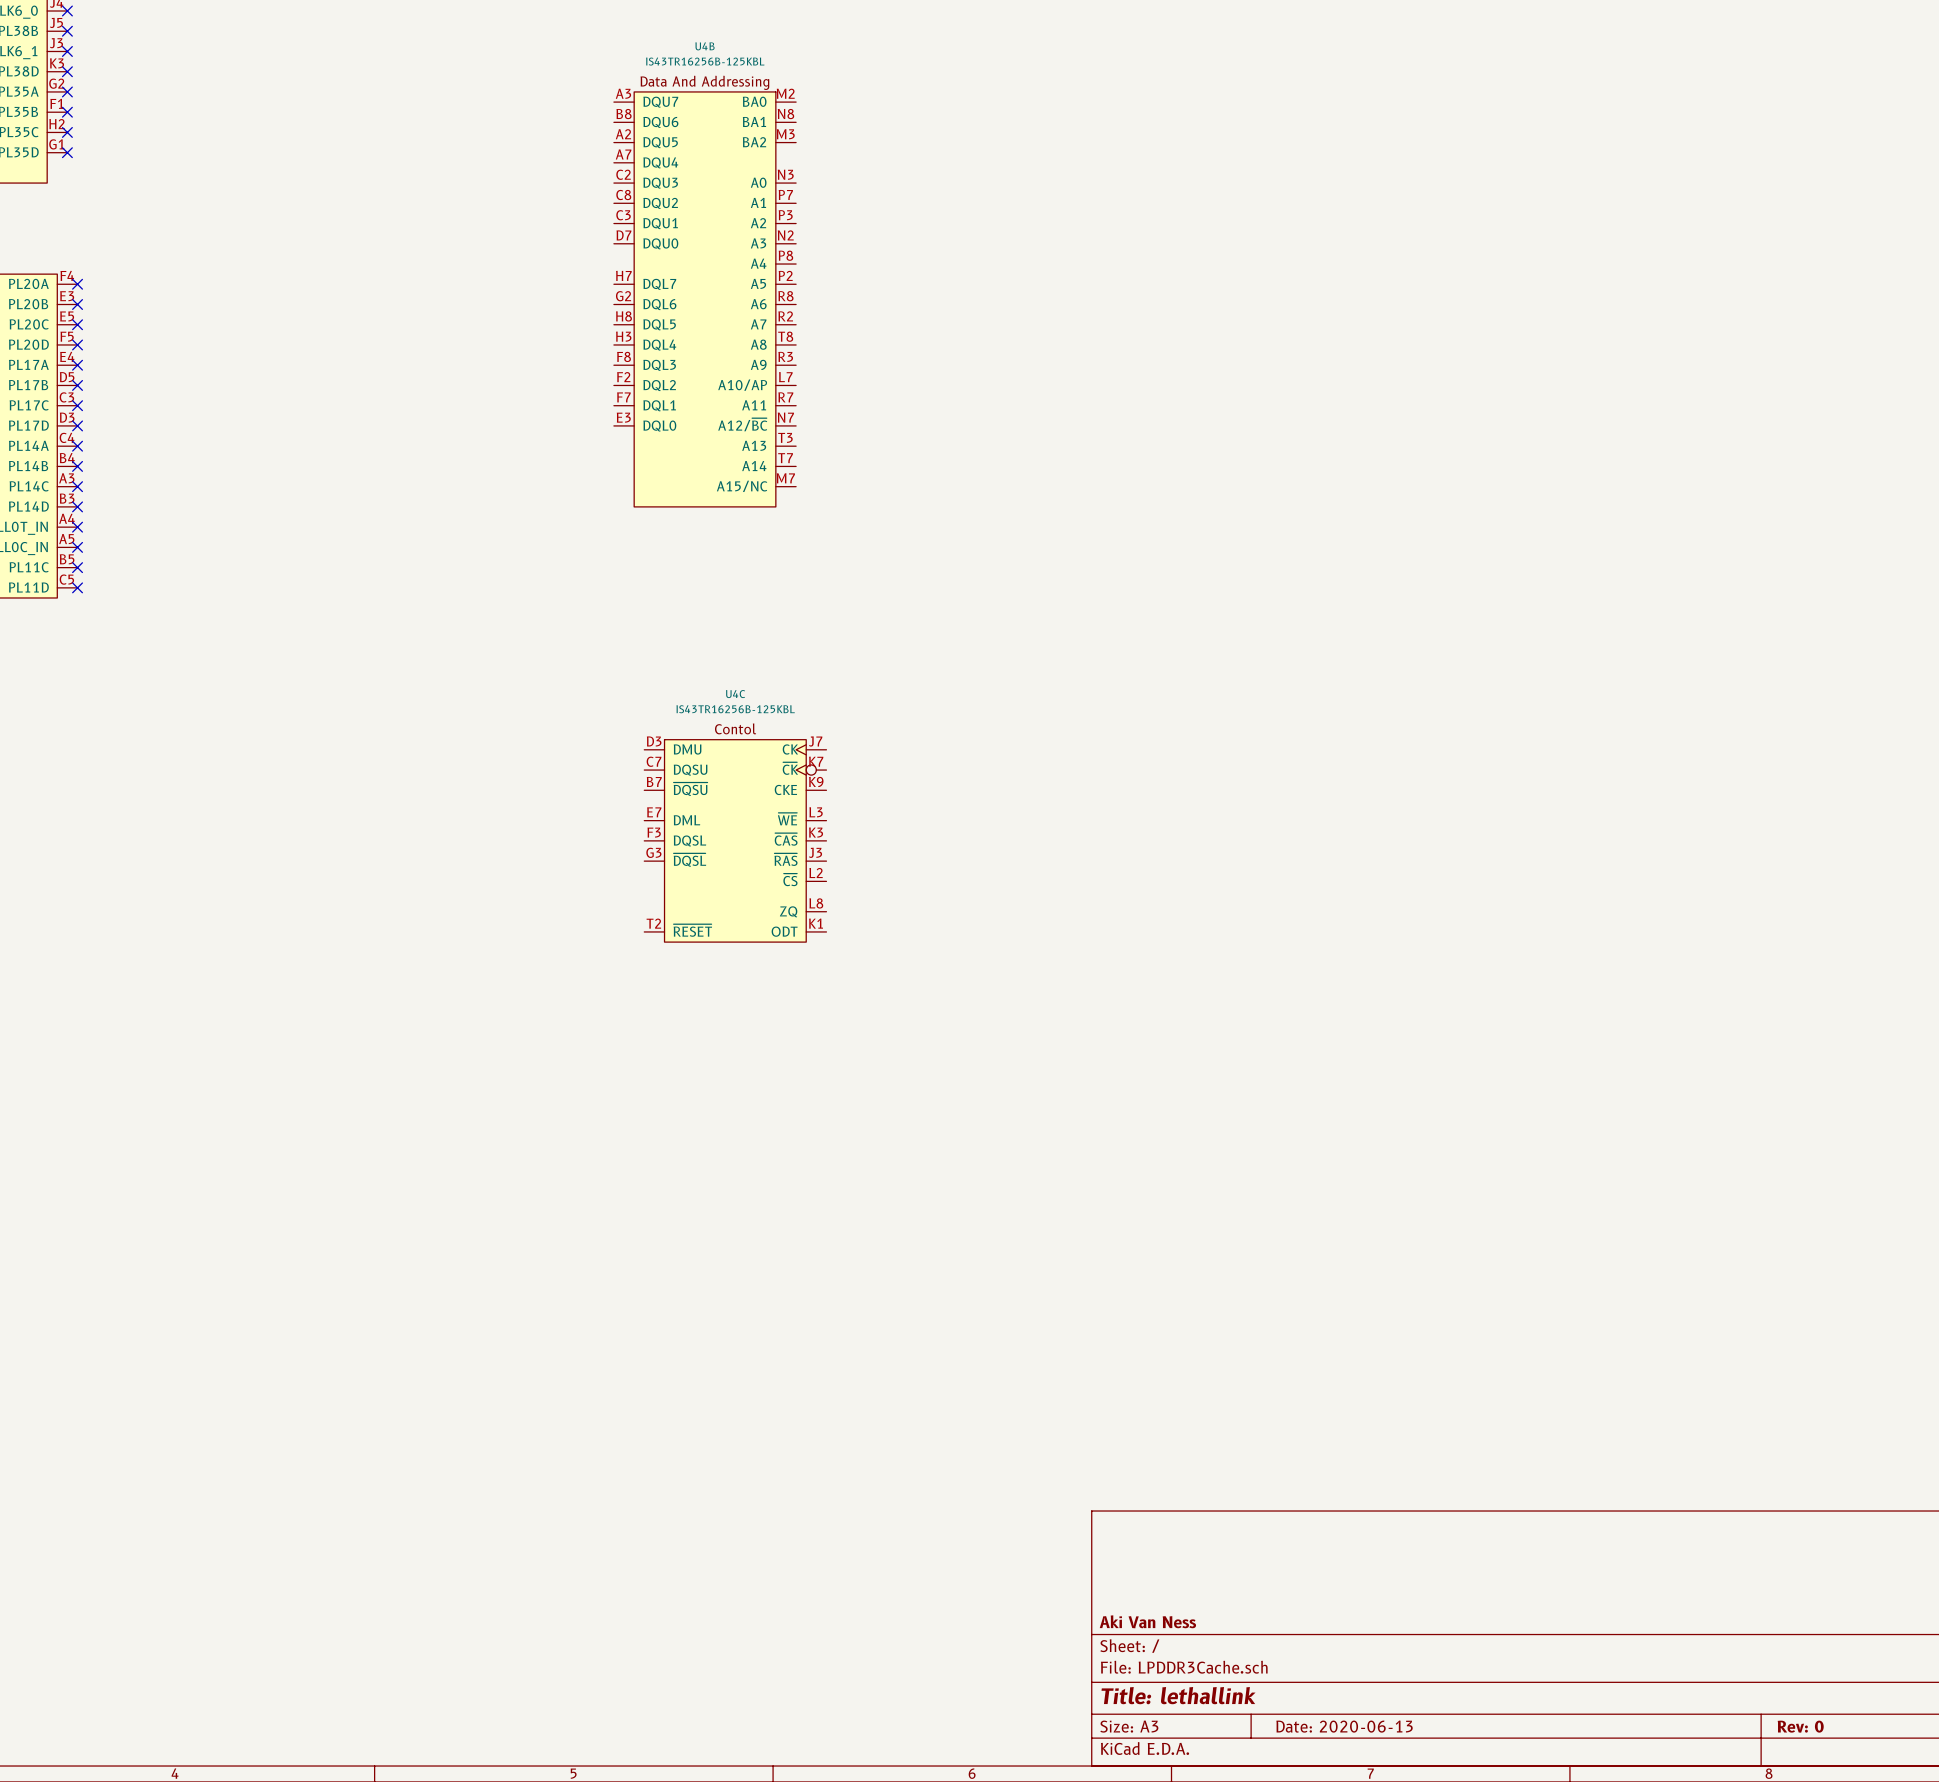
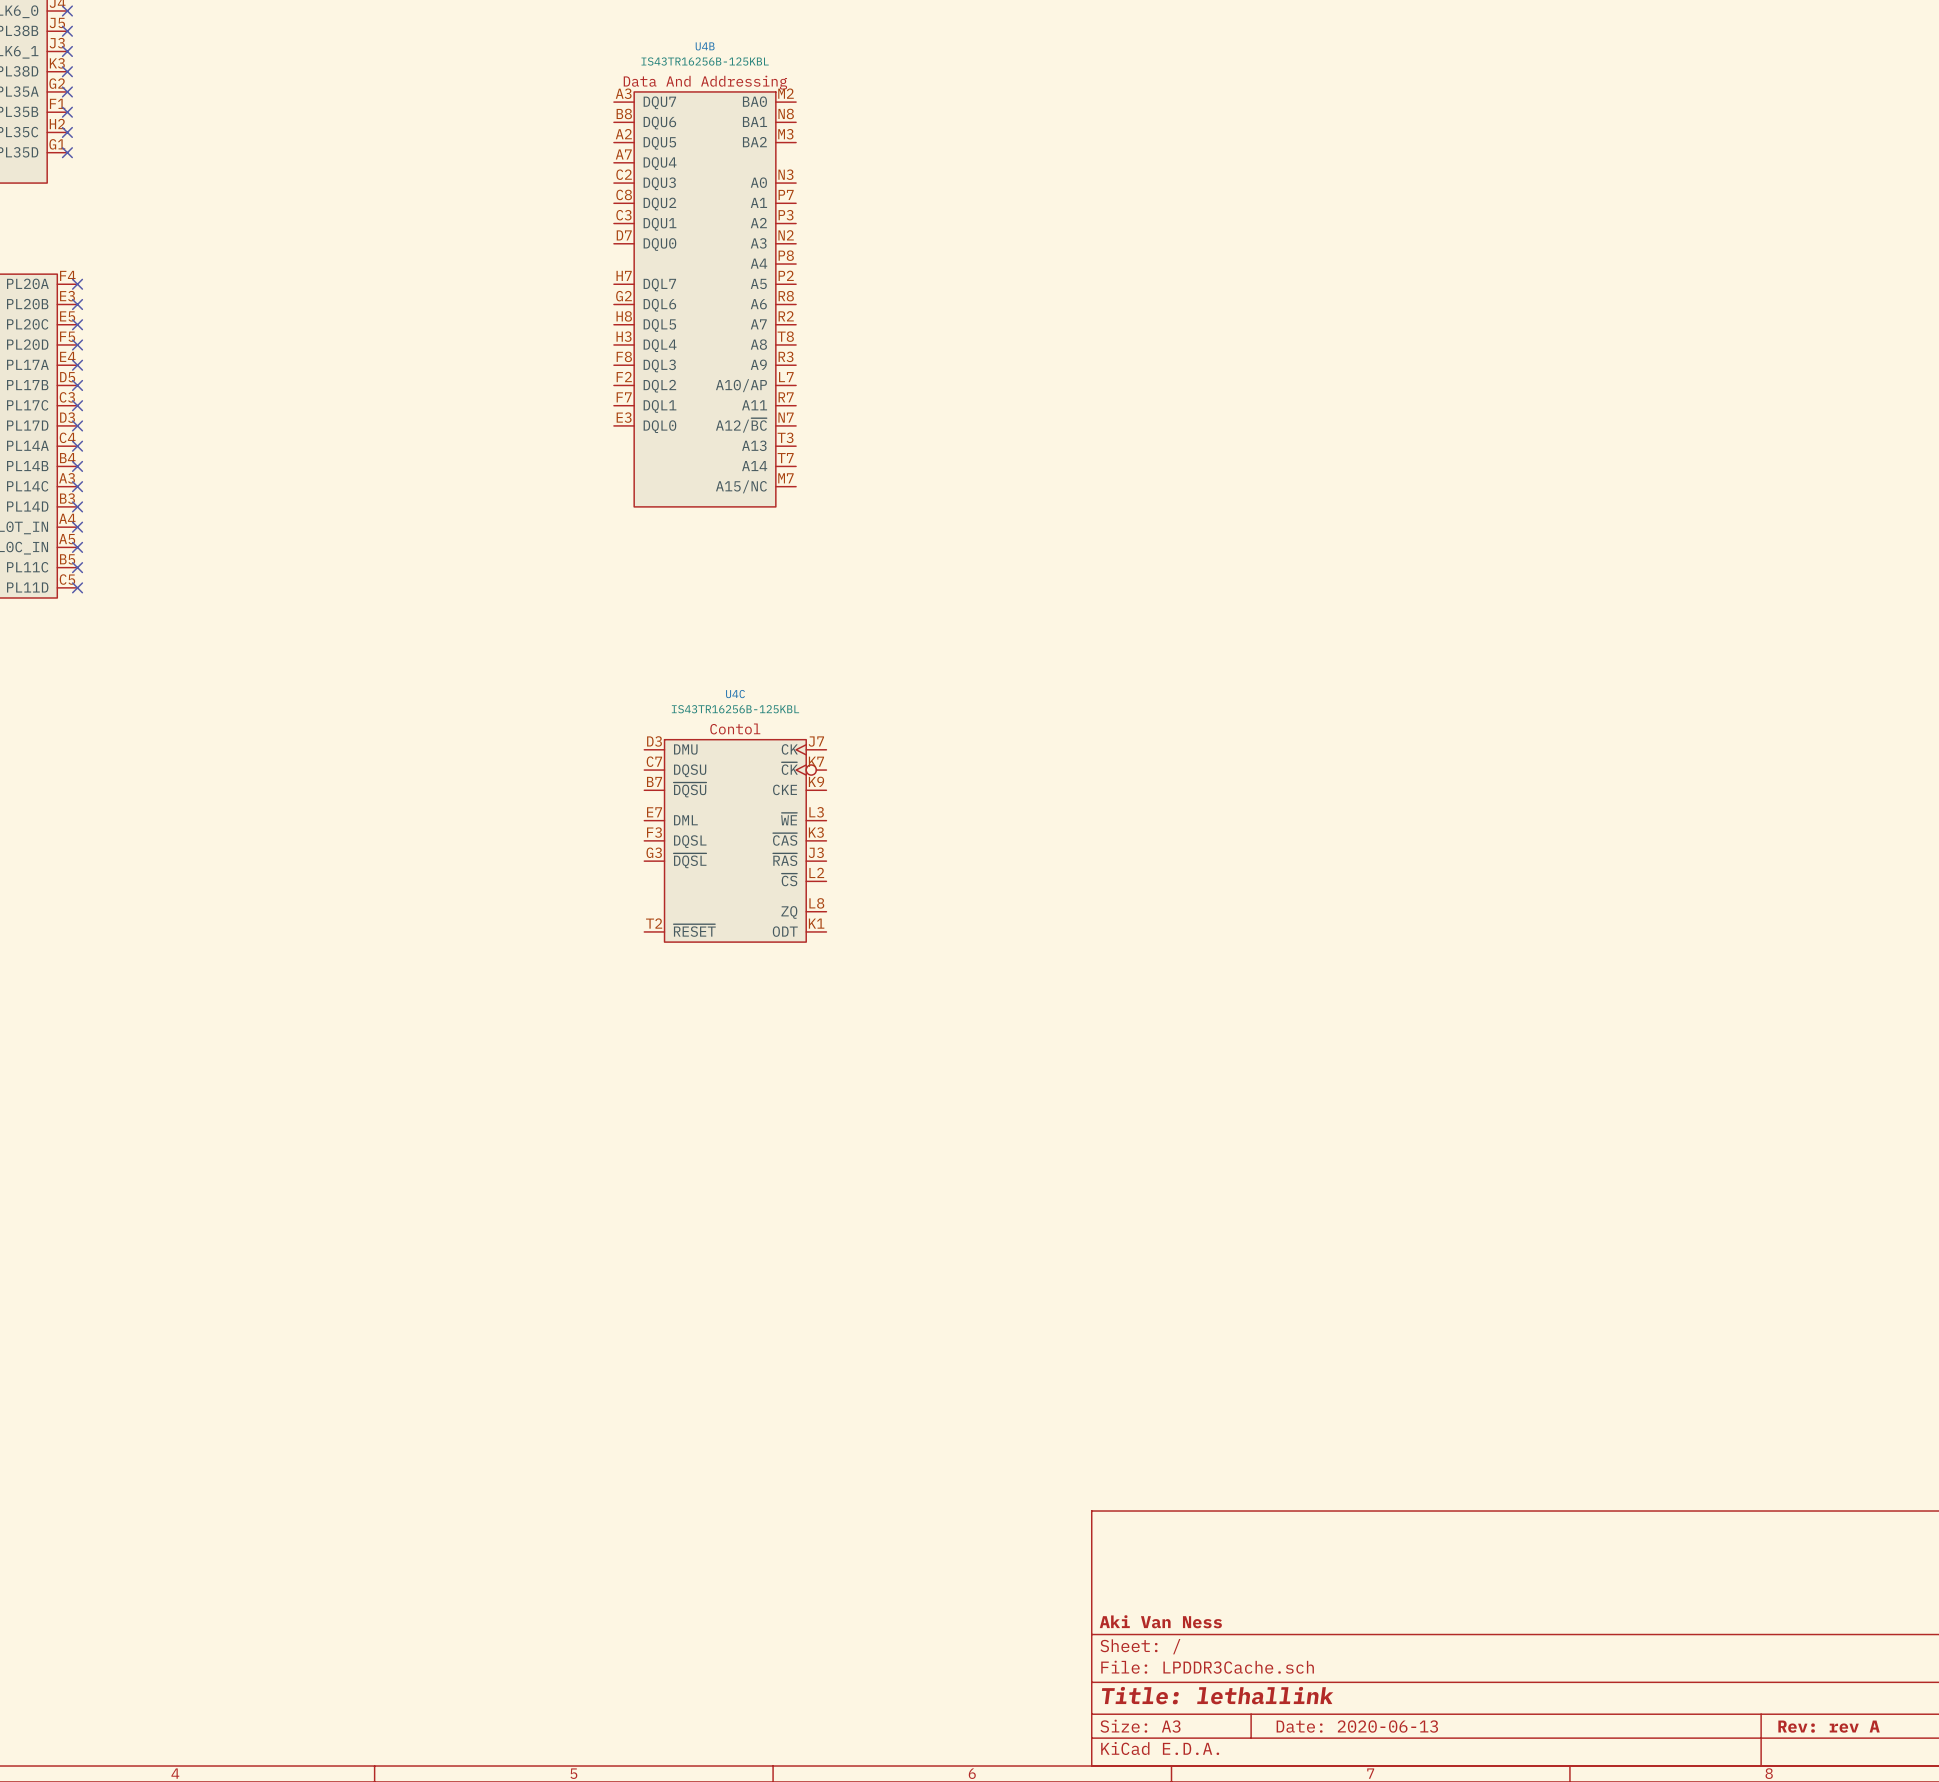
title block: Rev: 0 (1800, 1726) -> Rev: rev A (1829, 1726)

